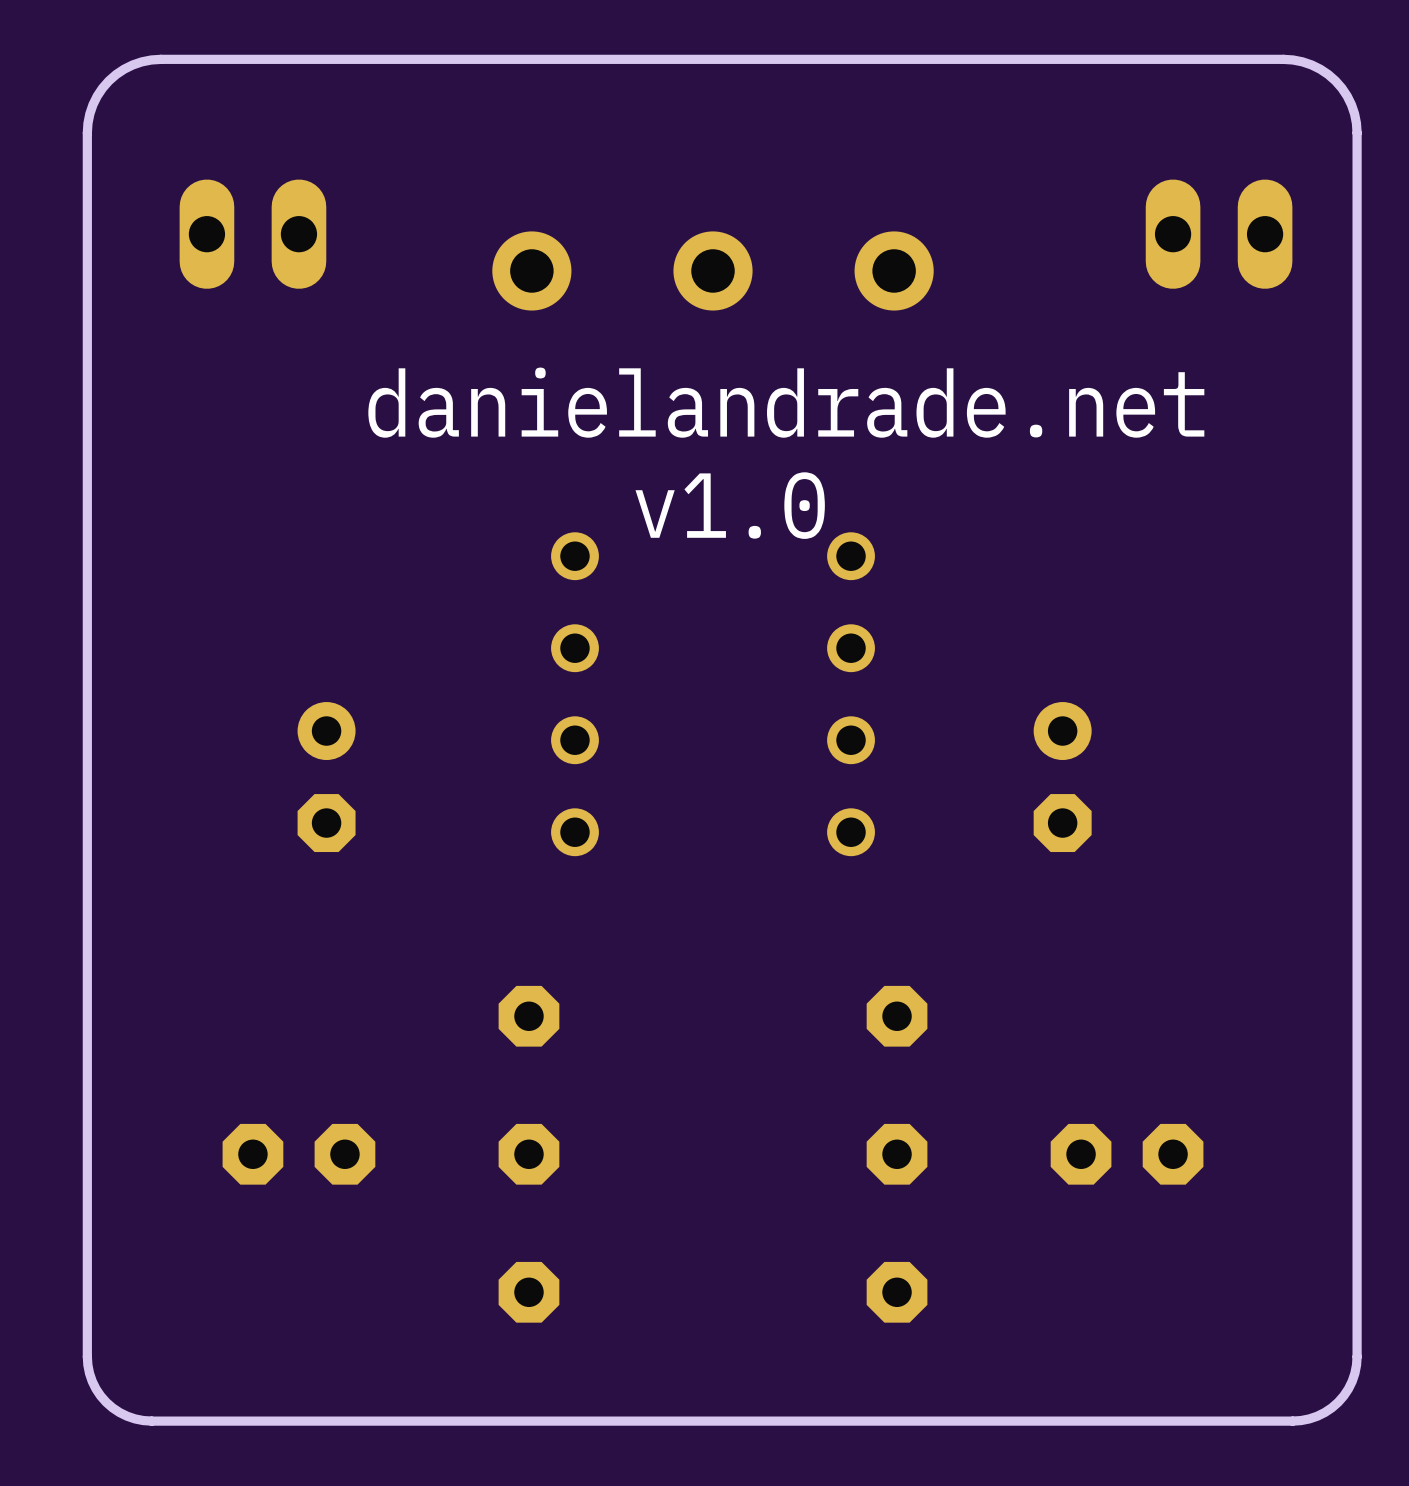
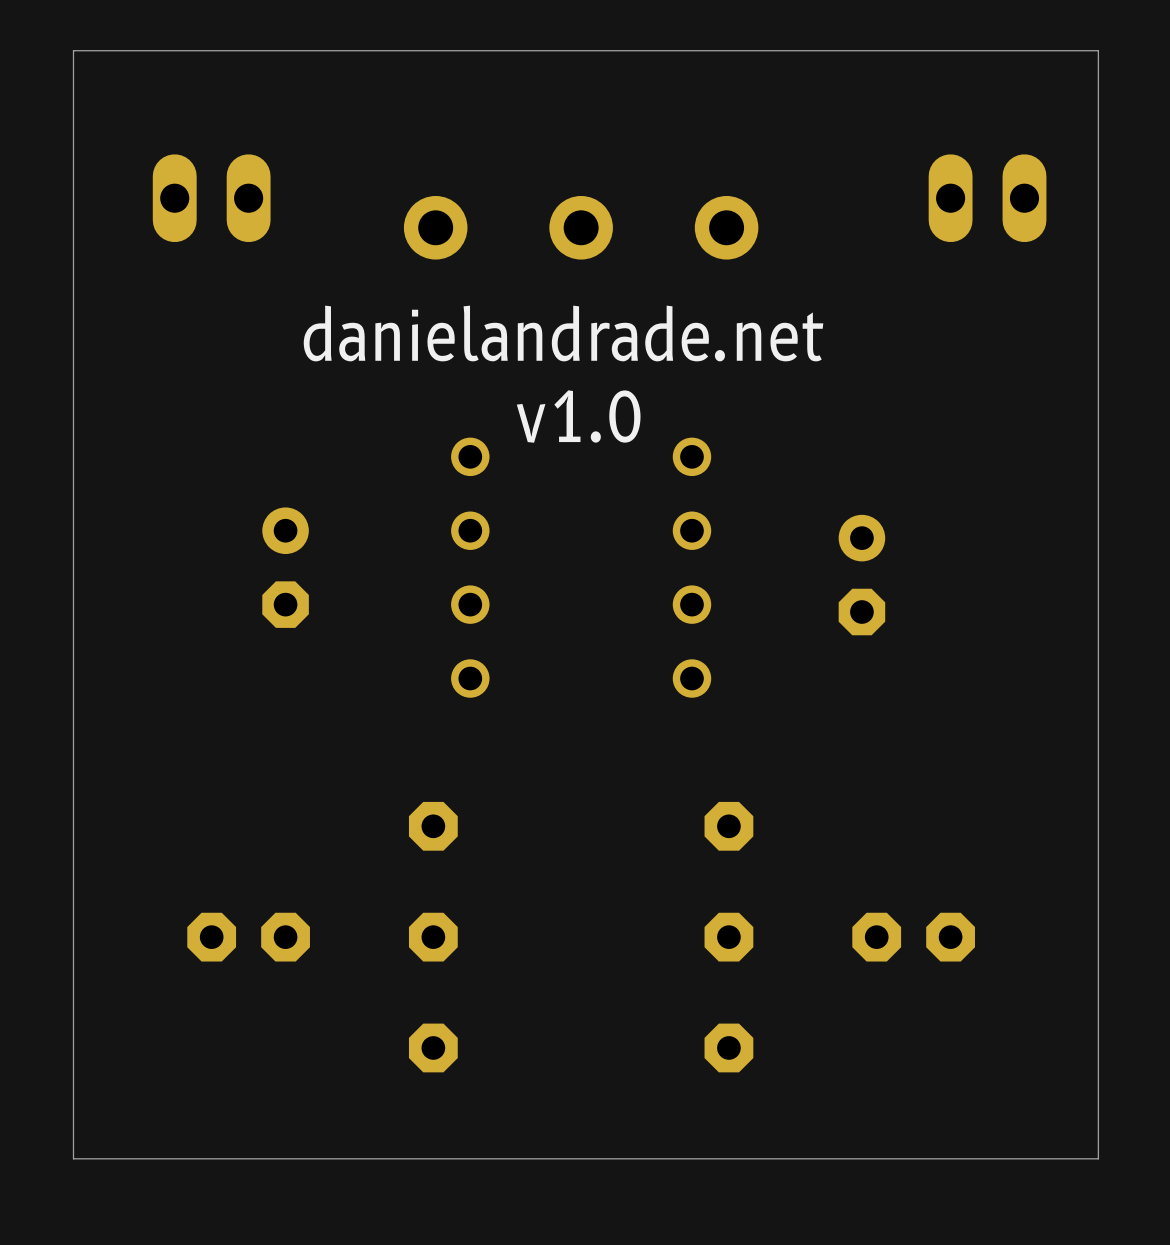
board edge: (1357, 132) (1351, 104) (1335, 80) (1311, 64) (1283, 59) (160, 59) (132, 64) (108, 80) (92, 104) (87, 132) (87, 1356) (92, 1381) (106, 1402) (127, 1416) (151, 1421) (1292, 1421) (1317, 1416) (1338, 1402) (1352, 1381) (1357, 1356) -> (1098, 116) (1098, 50) (73, 50) (73, 1158) (1098, 1158) (1098, 1099)
board edge width: thick (1357, 132) (1357, 1356) -> thin (1098, 116) (1098, 1099)
part position: (326, 777) -> (285, 567)
part position: (1062, 777) -> (861, 575)

